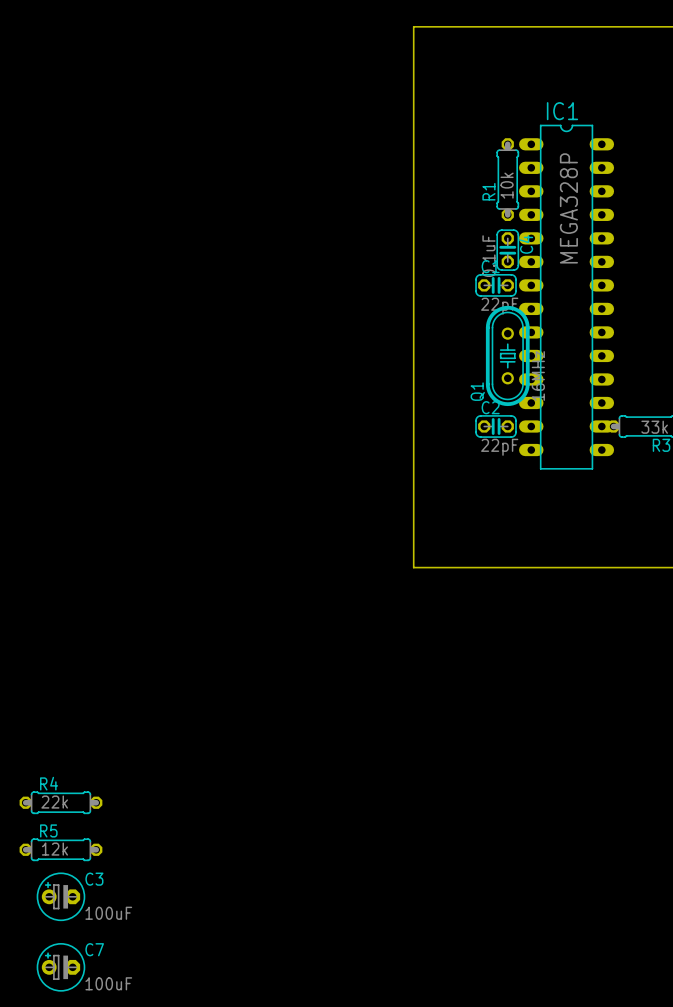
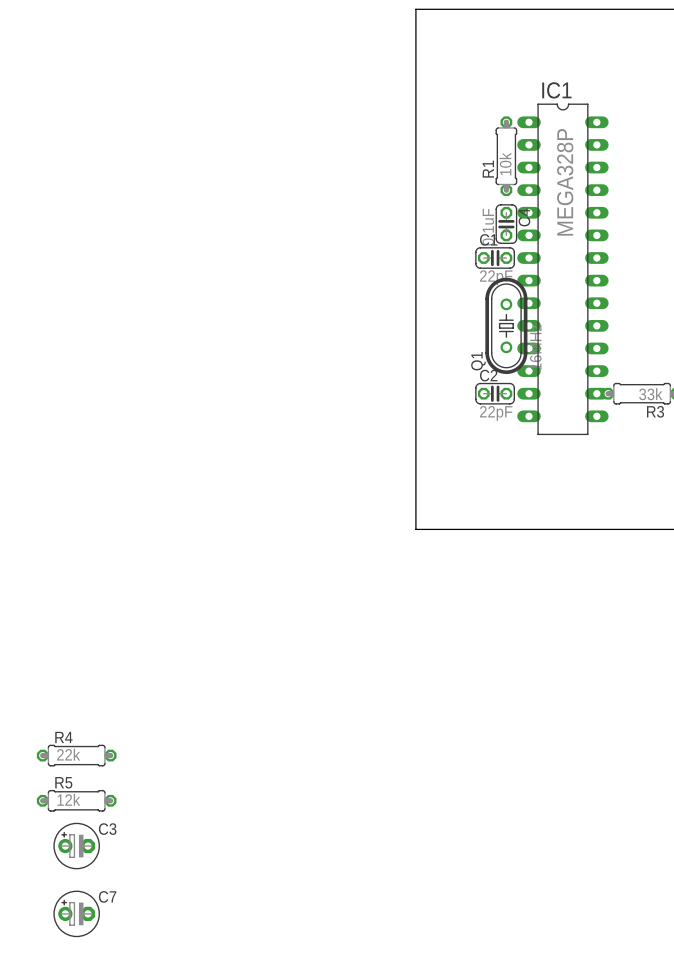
C3 value: 100uF (108, 913) -> none
C7 value: 100uF (108, 983) -> none

